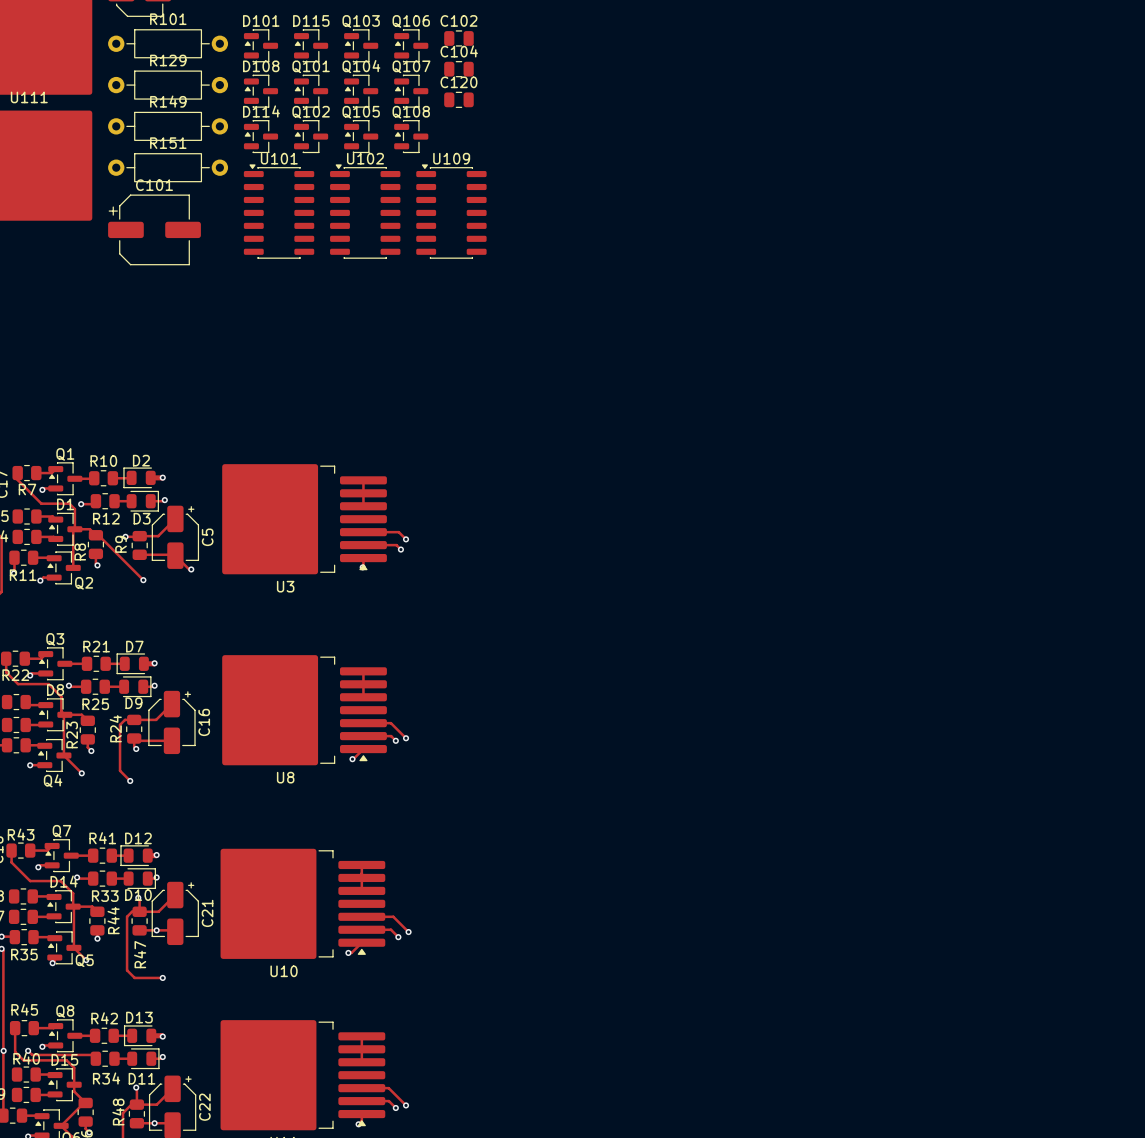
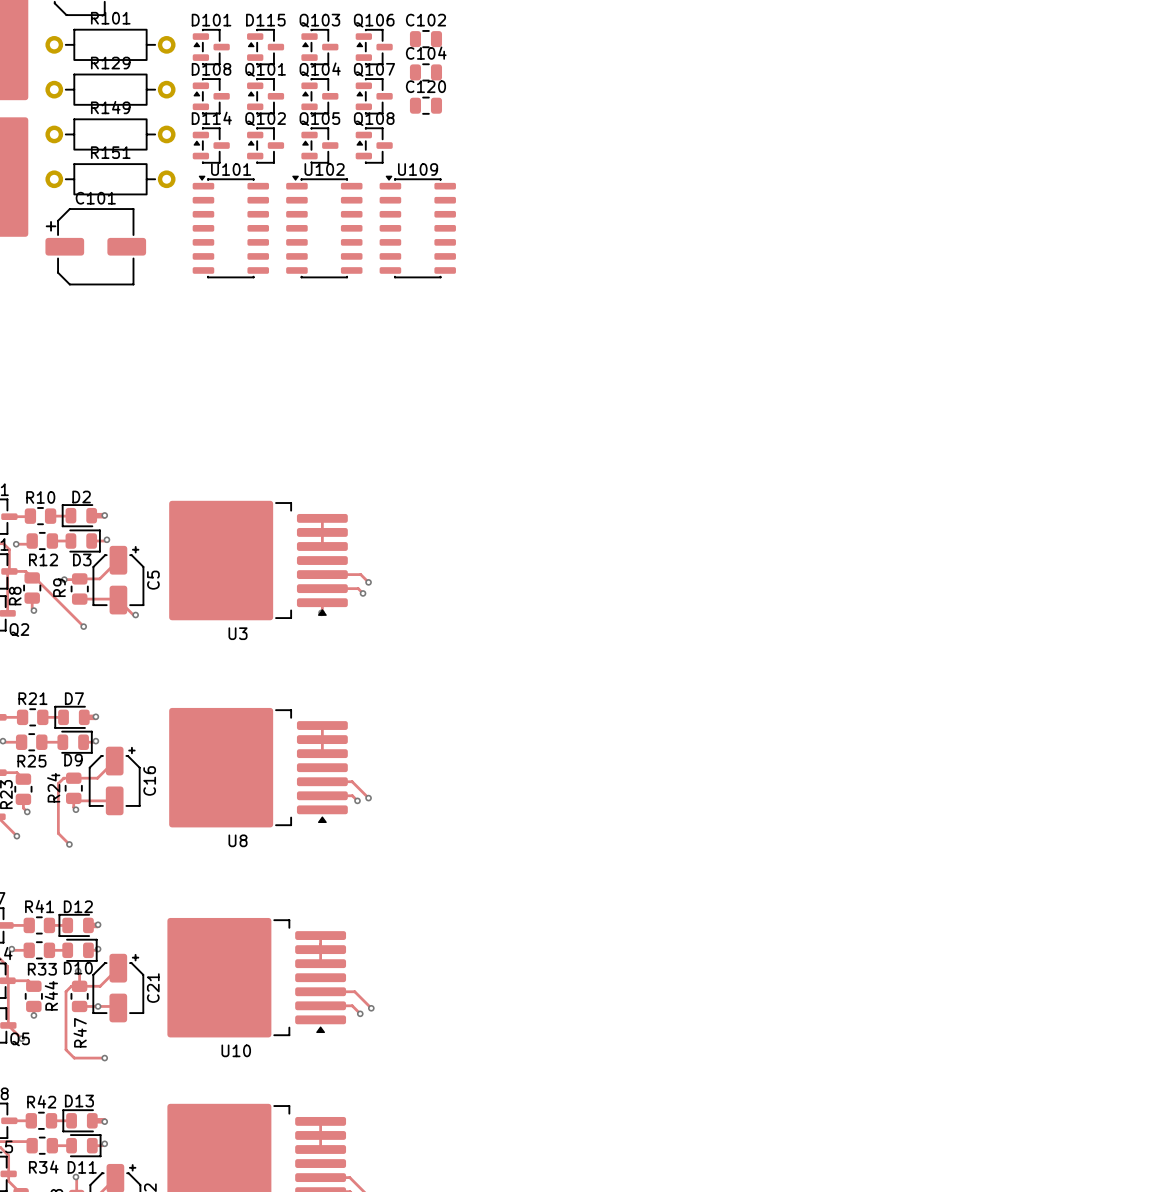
track: (363, 749) (352, 759) -> none
via: (352, 759) -> none
track: (361, 942) (351, 952) (348, 952) -> none
via: (348, 952) -> none

